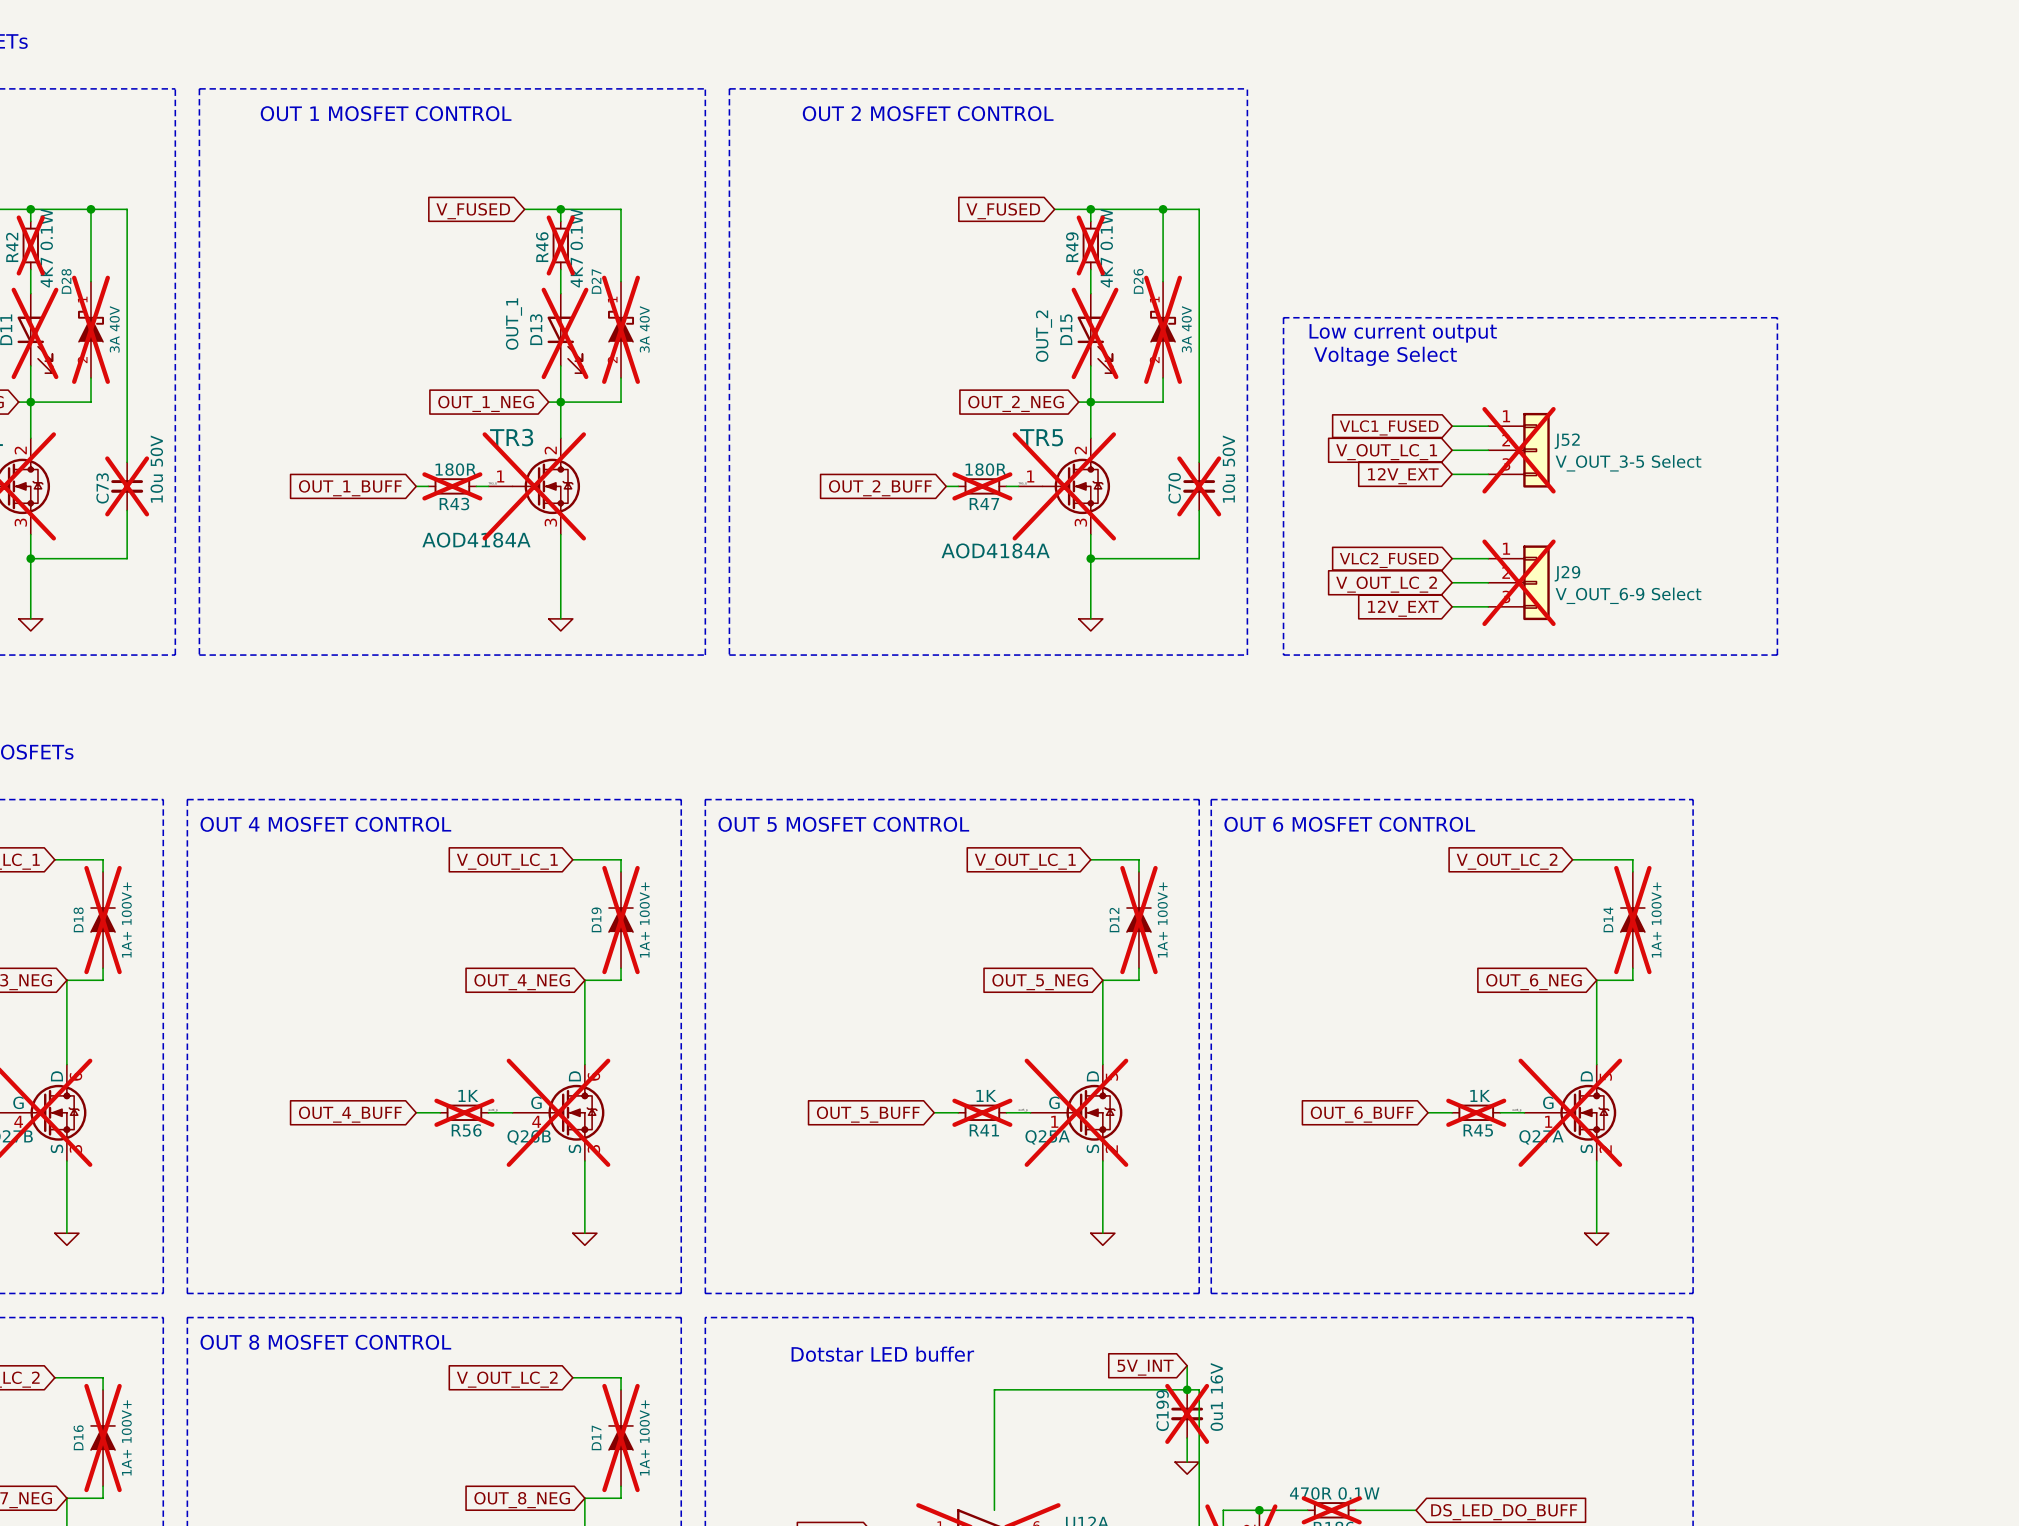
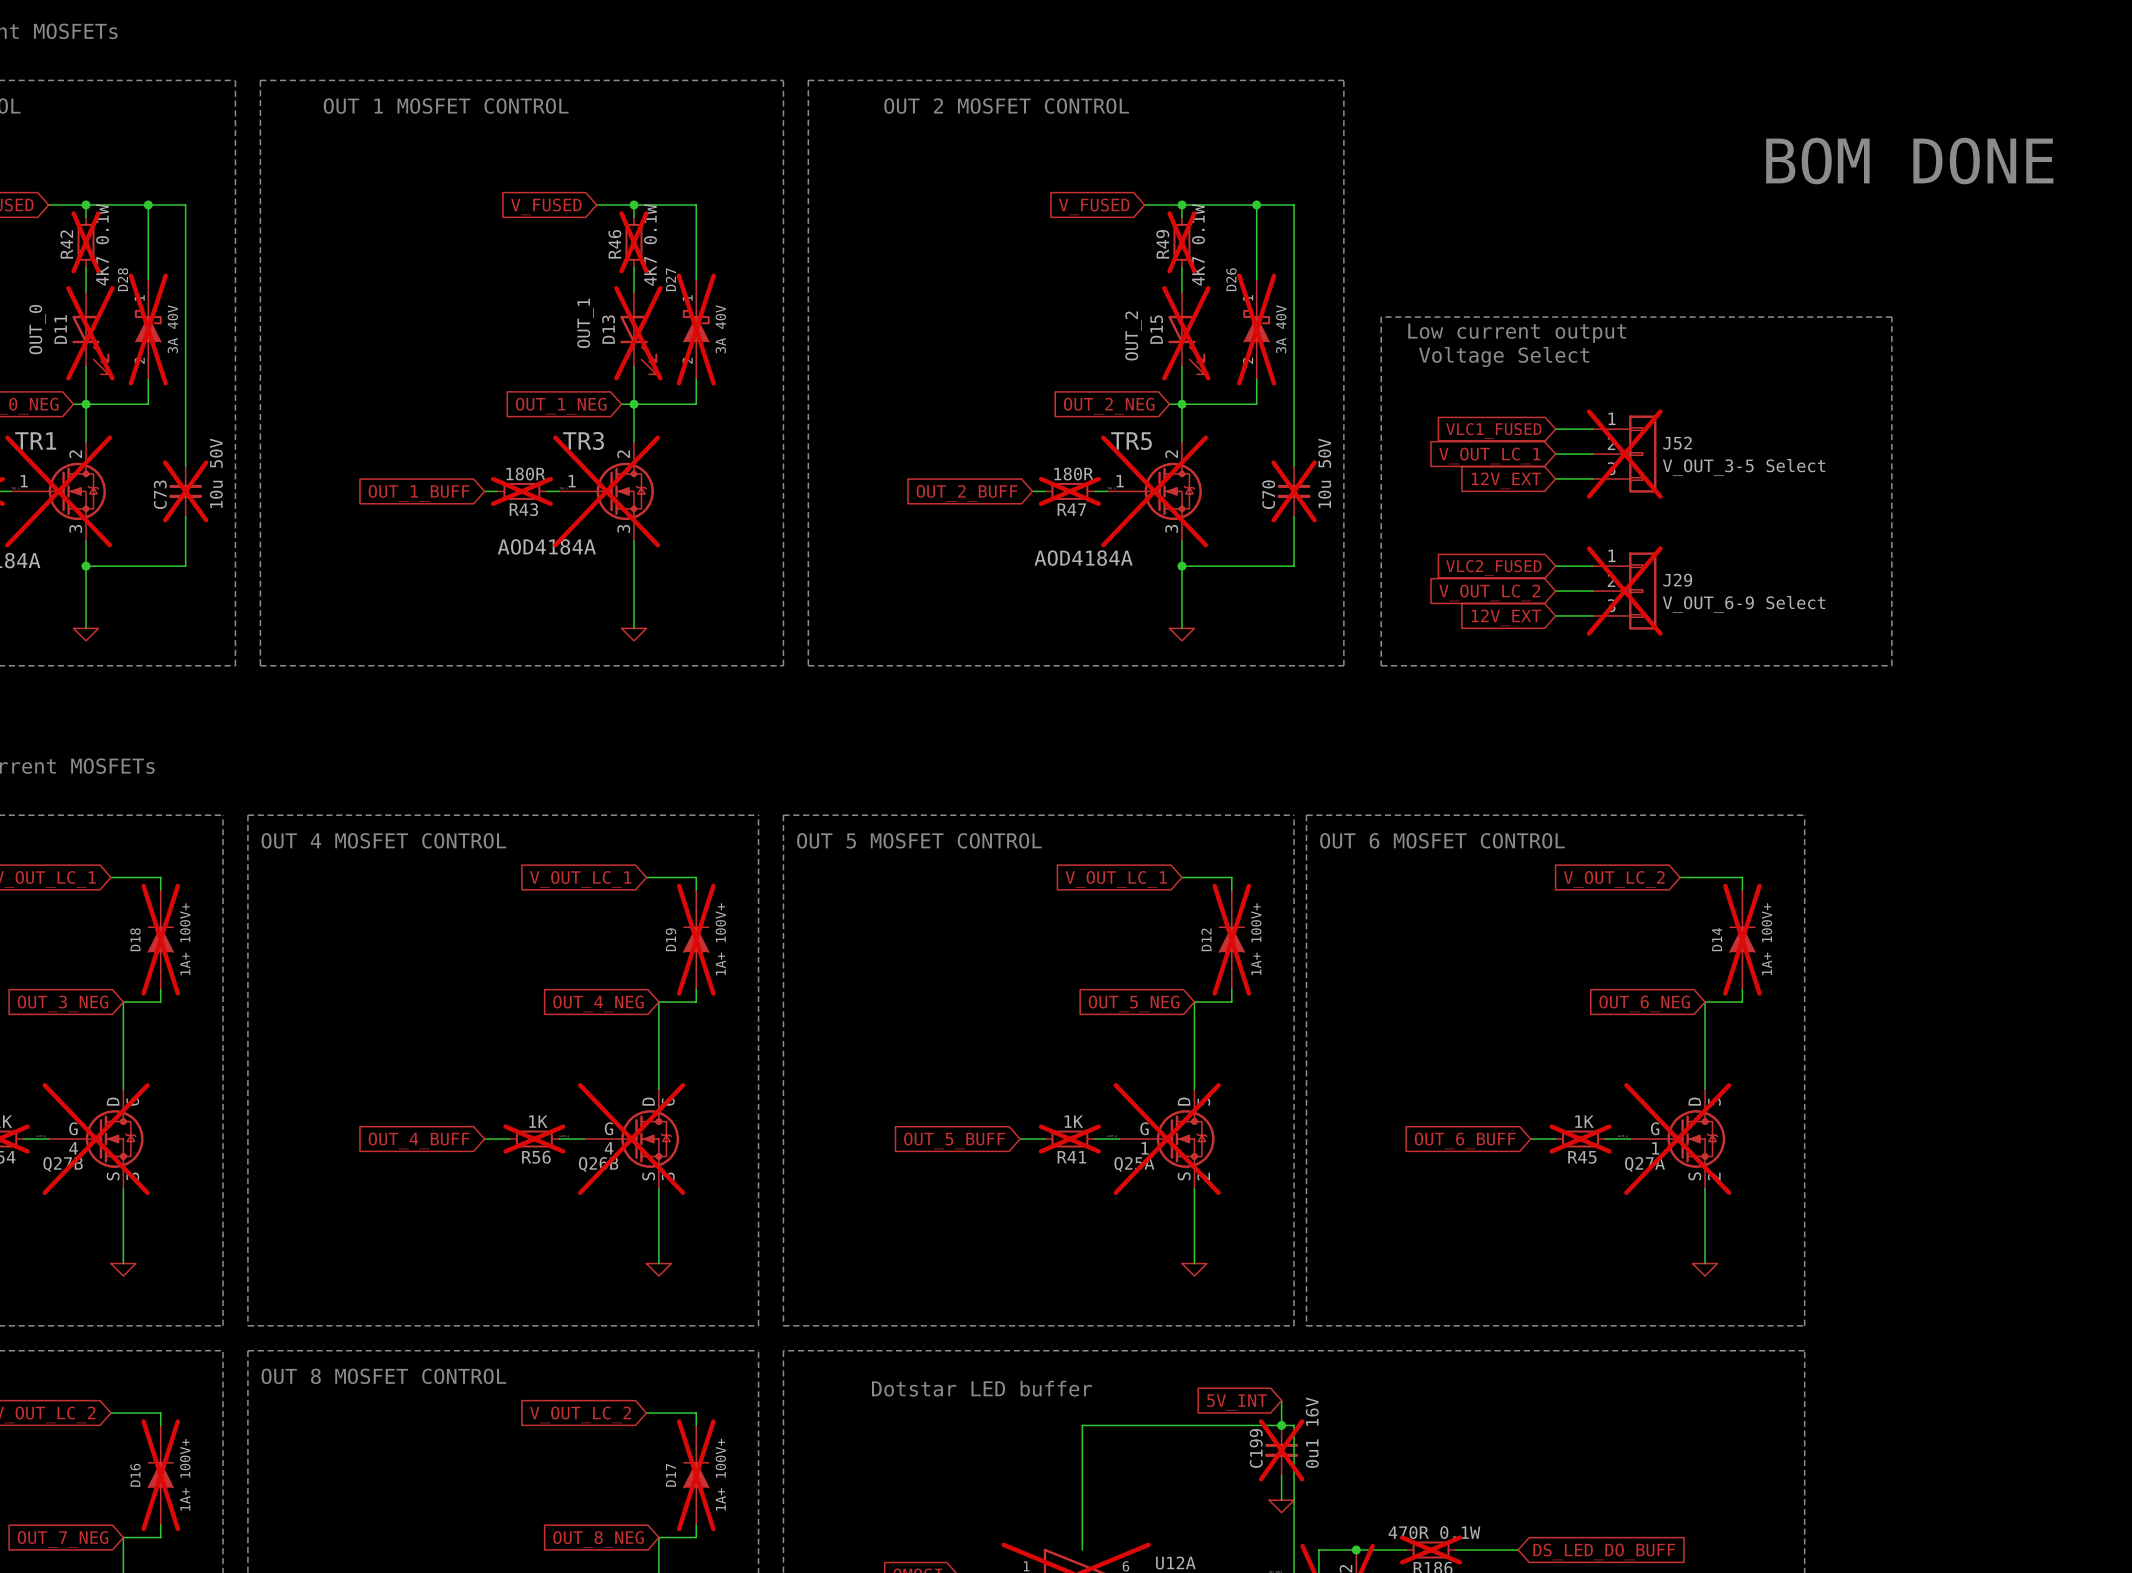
text: none -> BOM DONE (1909, 161)

